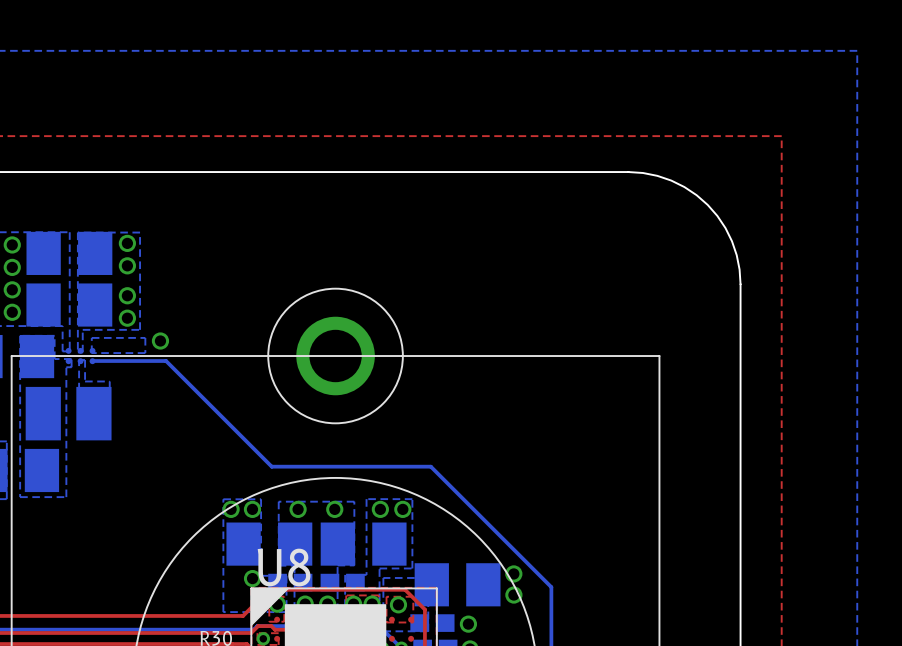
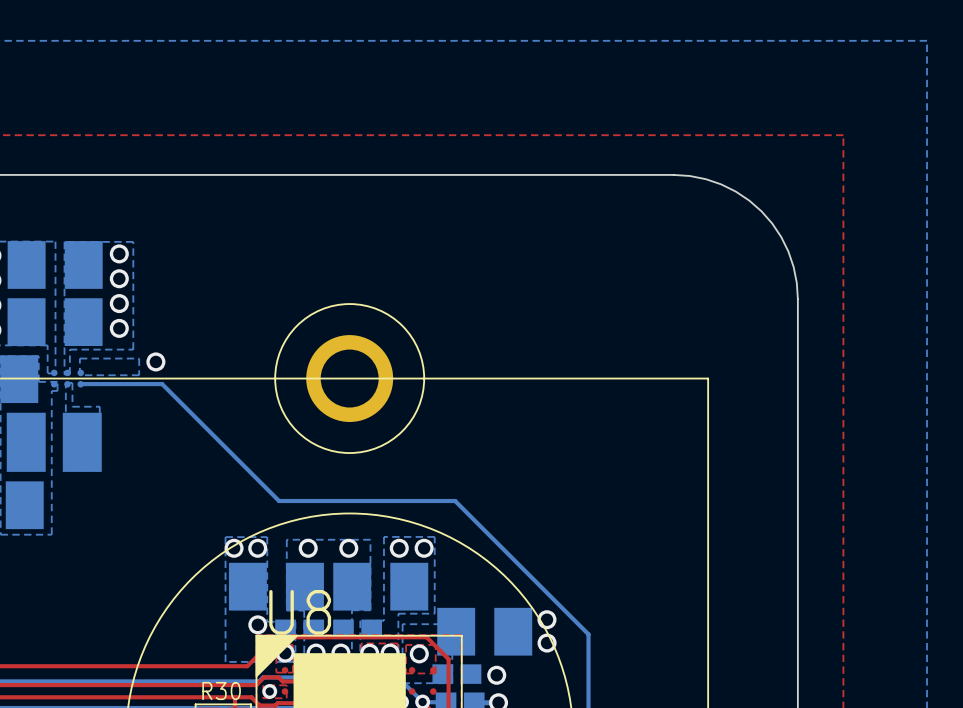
via: none -> (119, 303)
via: (127, 295) -> none
via: none -> (119, 328)
via: (127, 318) -> none

